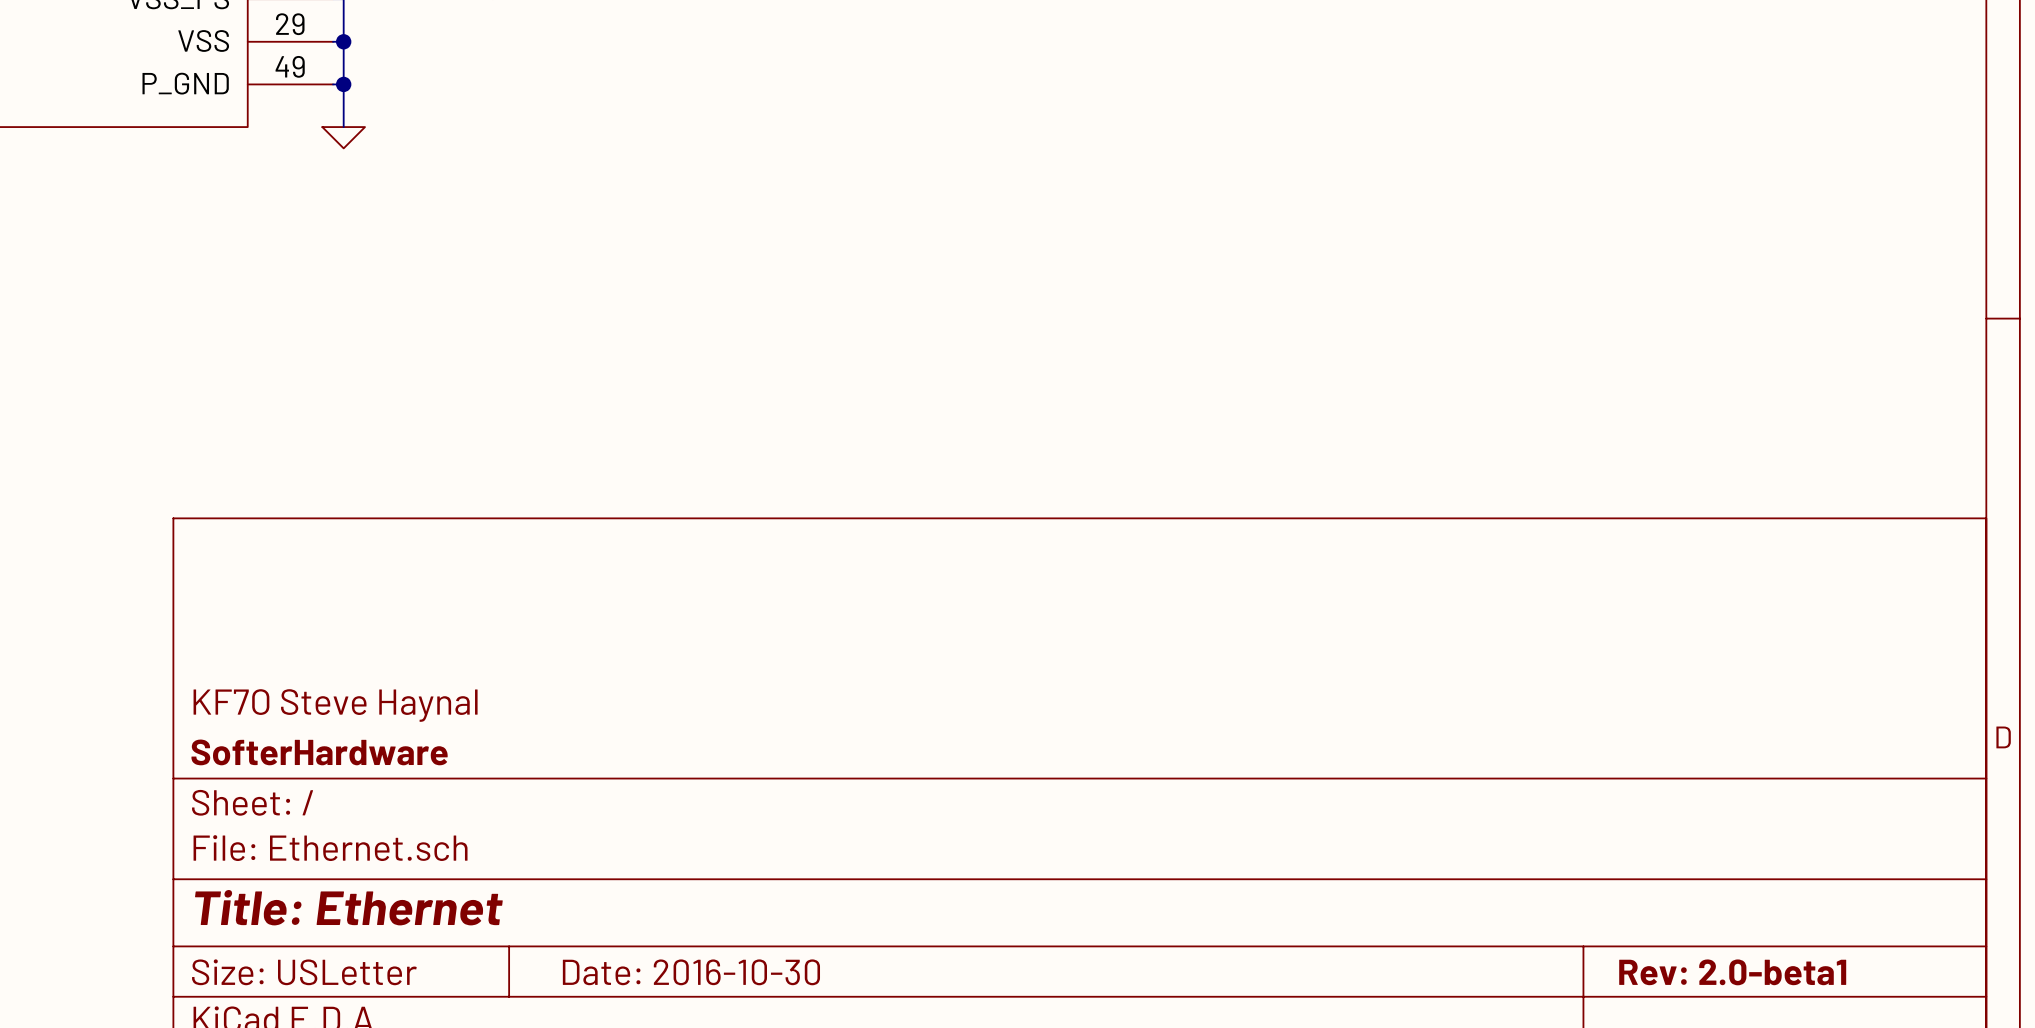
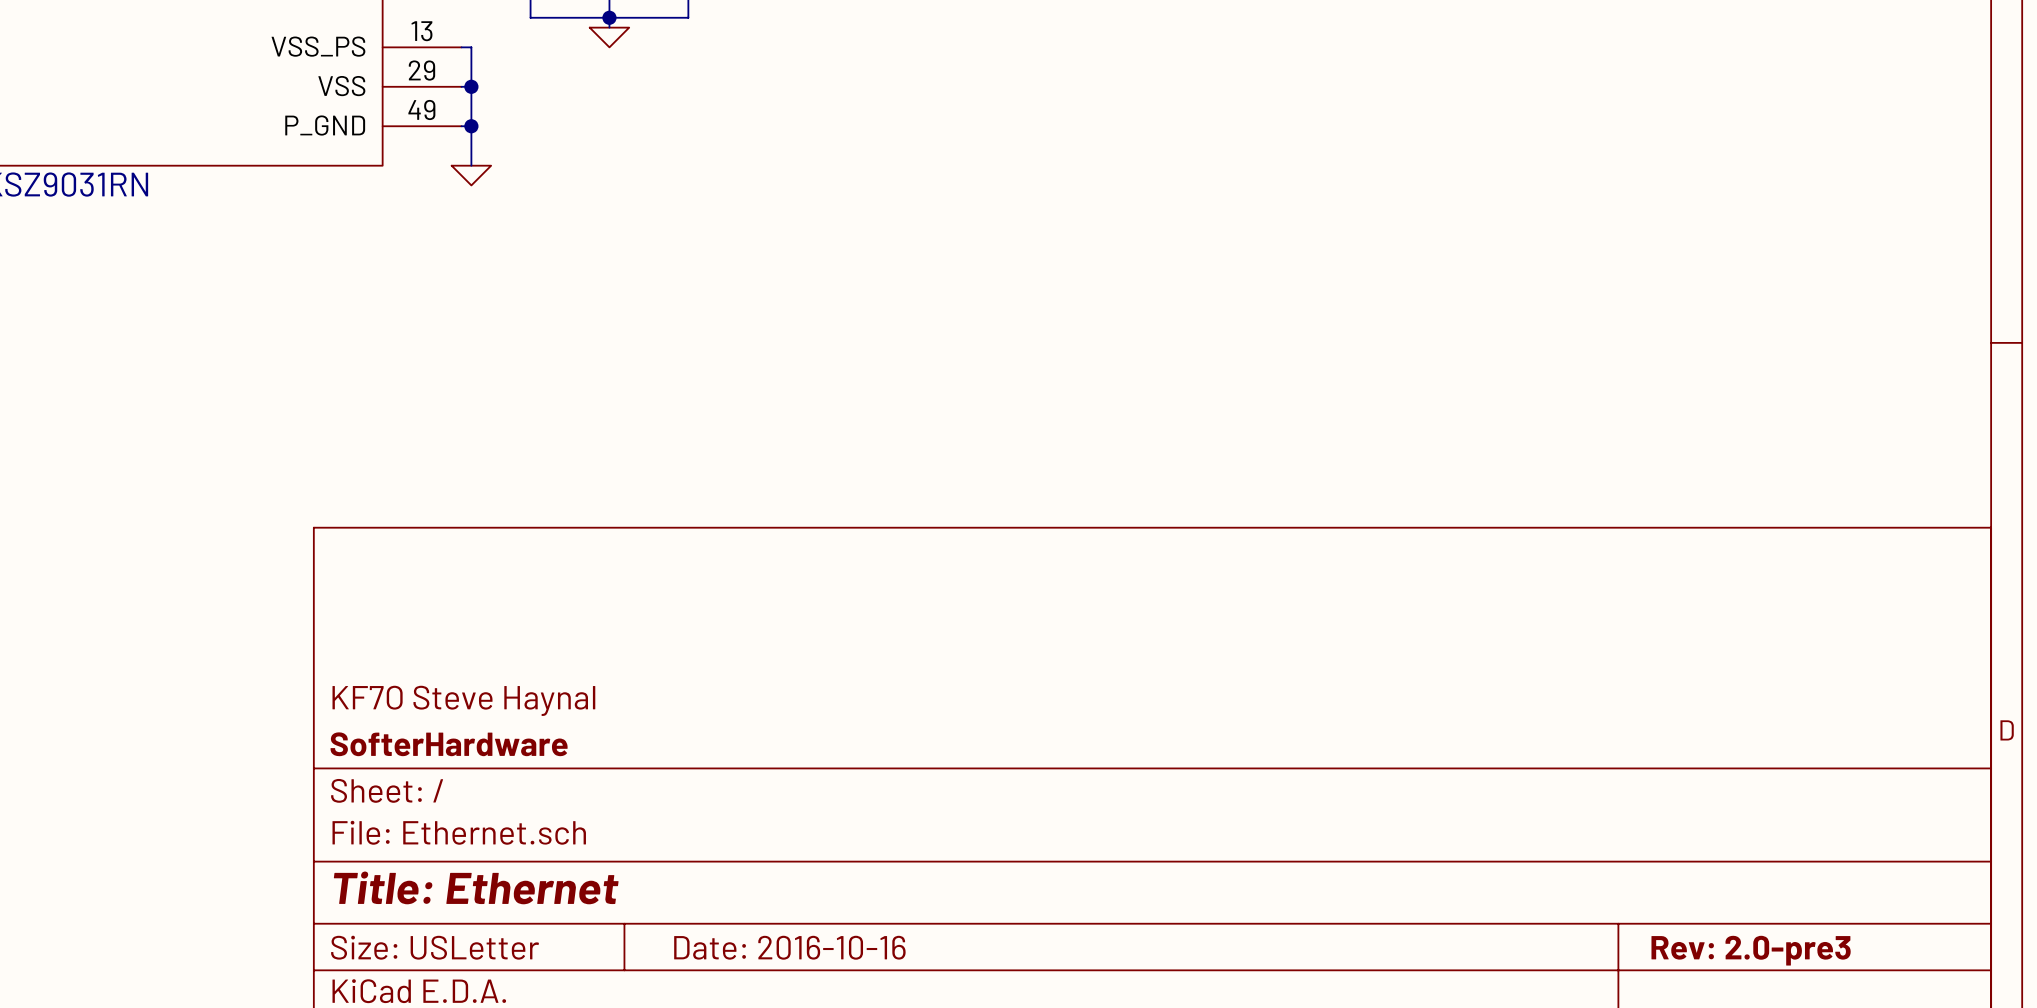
title block: Date: 2016-10-30 (691, 972) -> Date: 2016-10-16 (789, 947)
title block: Rev: 2.0-beta1 (1732, 972) -> Rev: 2.0-pre3 (1751, 950)

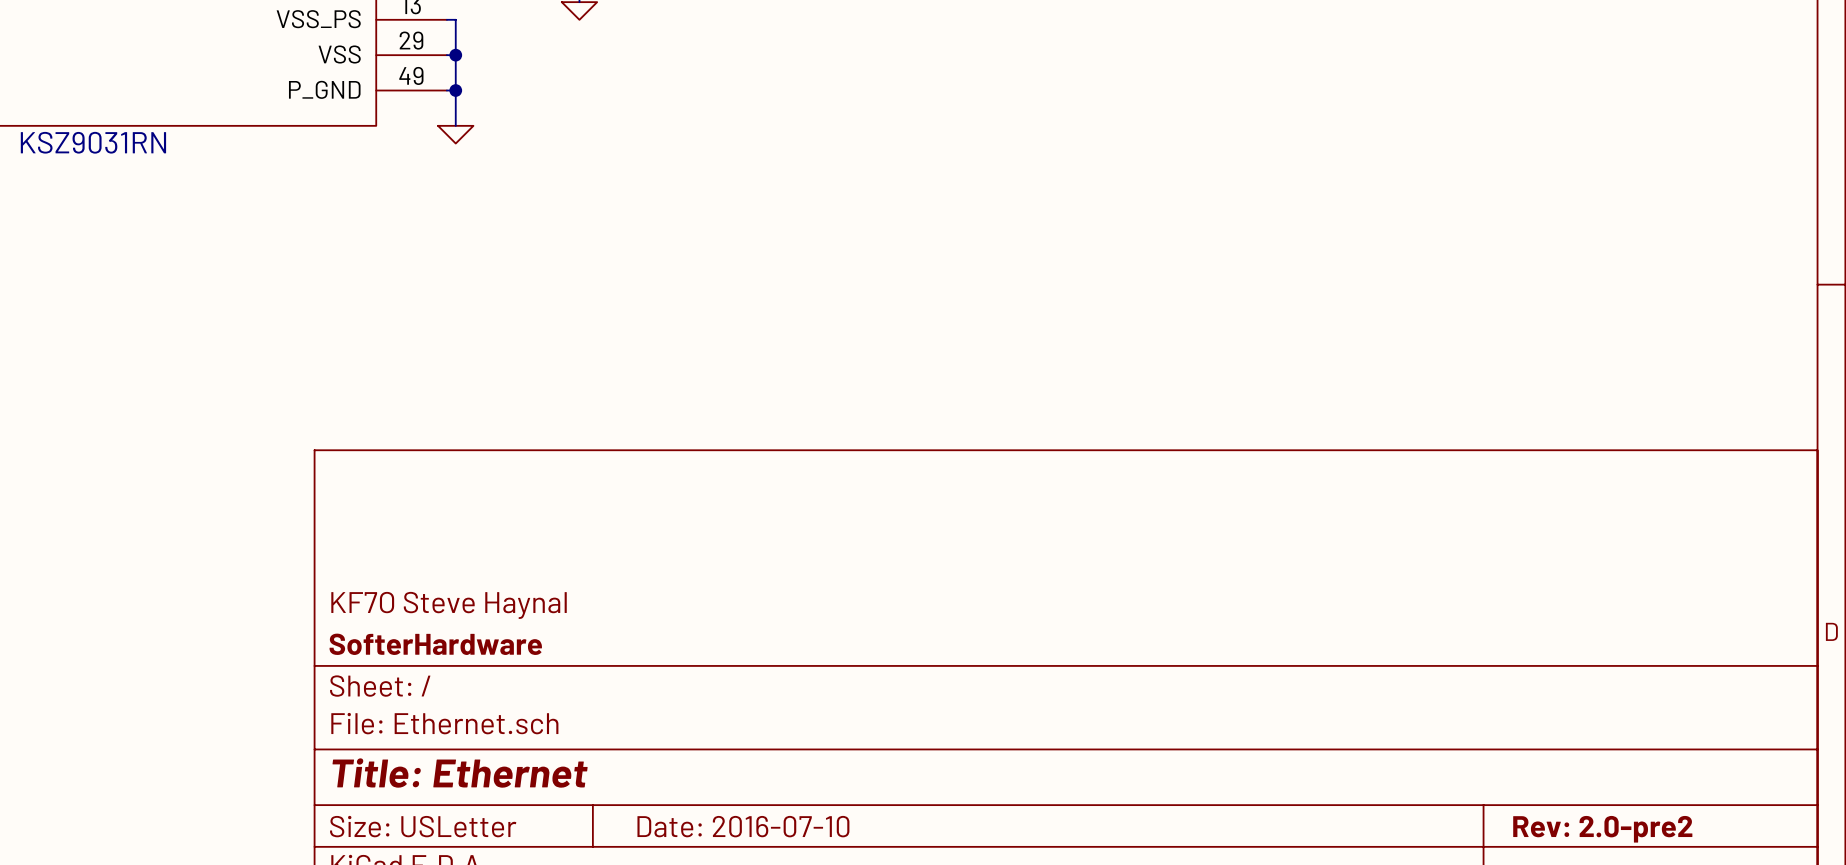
title block: Date: 2016-10-16 (789, 947) -> Date: 2016-07-10 (743, 826)
title block: Rev: 2.0-pre3 (1751, 950) -> Rev: 2.0-pre2 (1602, 829)

